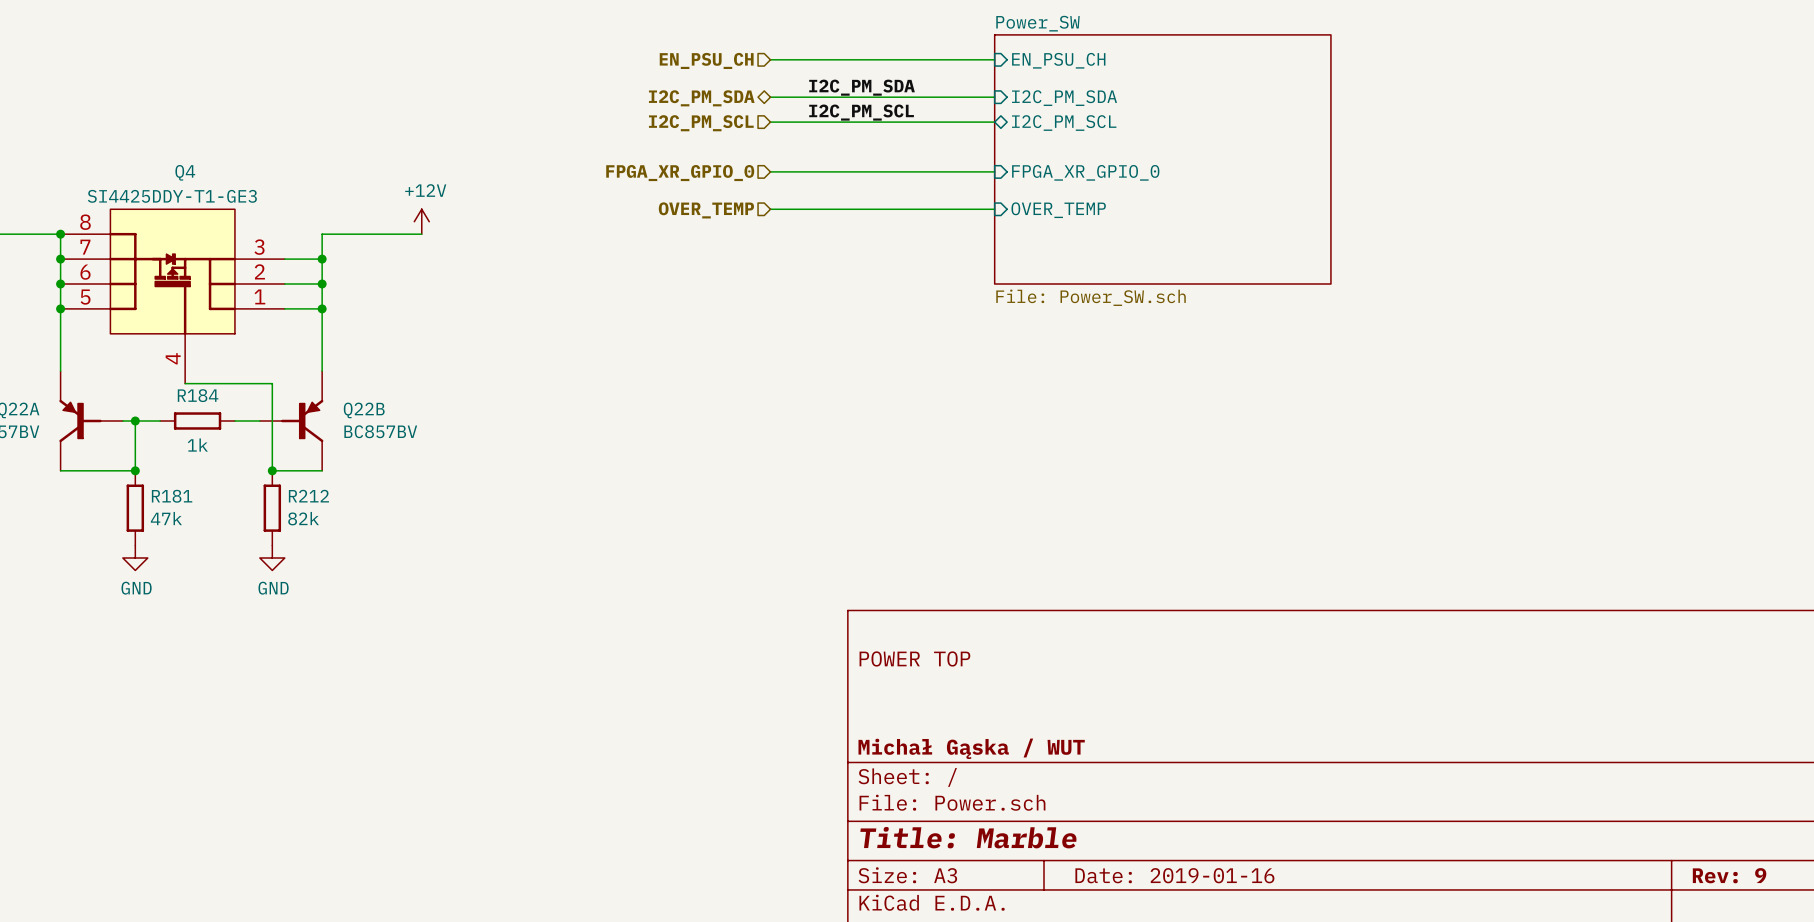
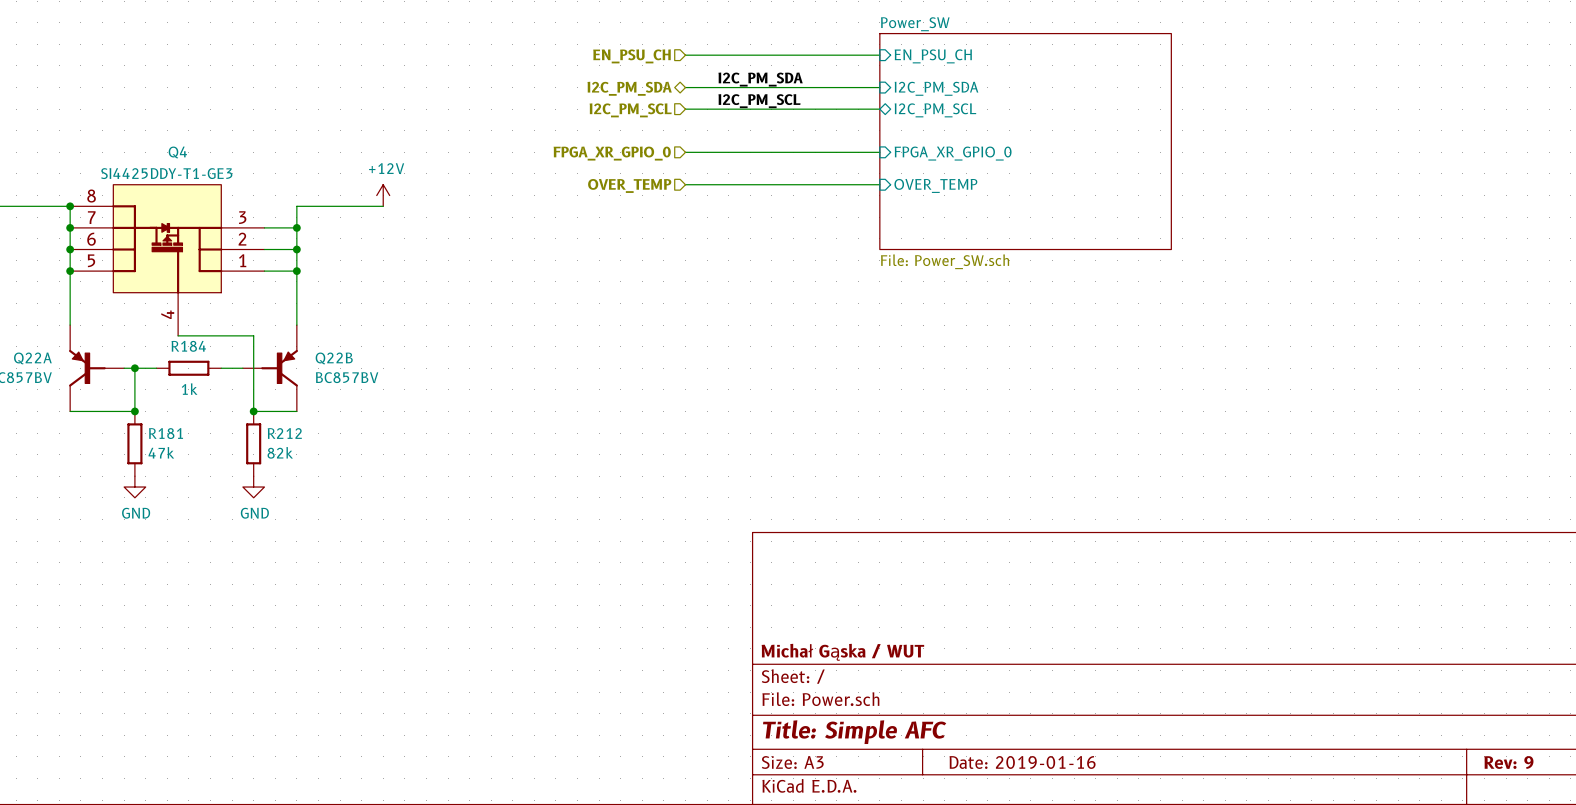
title block: POWER TOP (914, 658) -> none
title block: Title: Marble (968, 837) -> Title: Simple AFC (854, 732)

